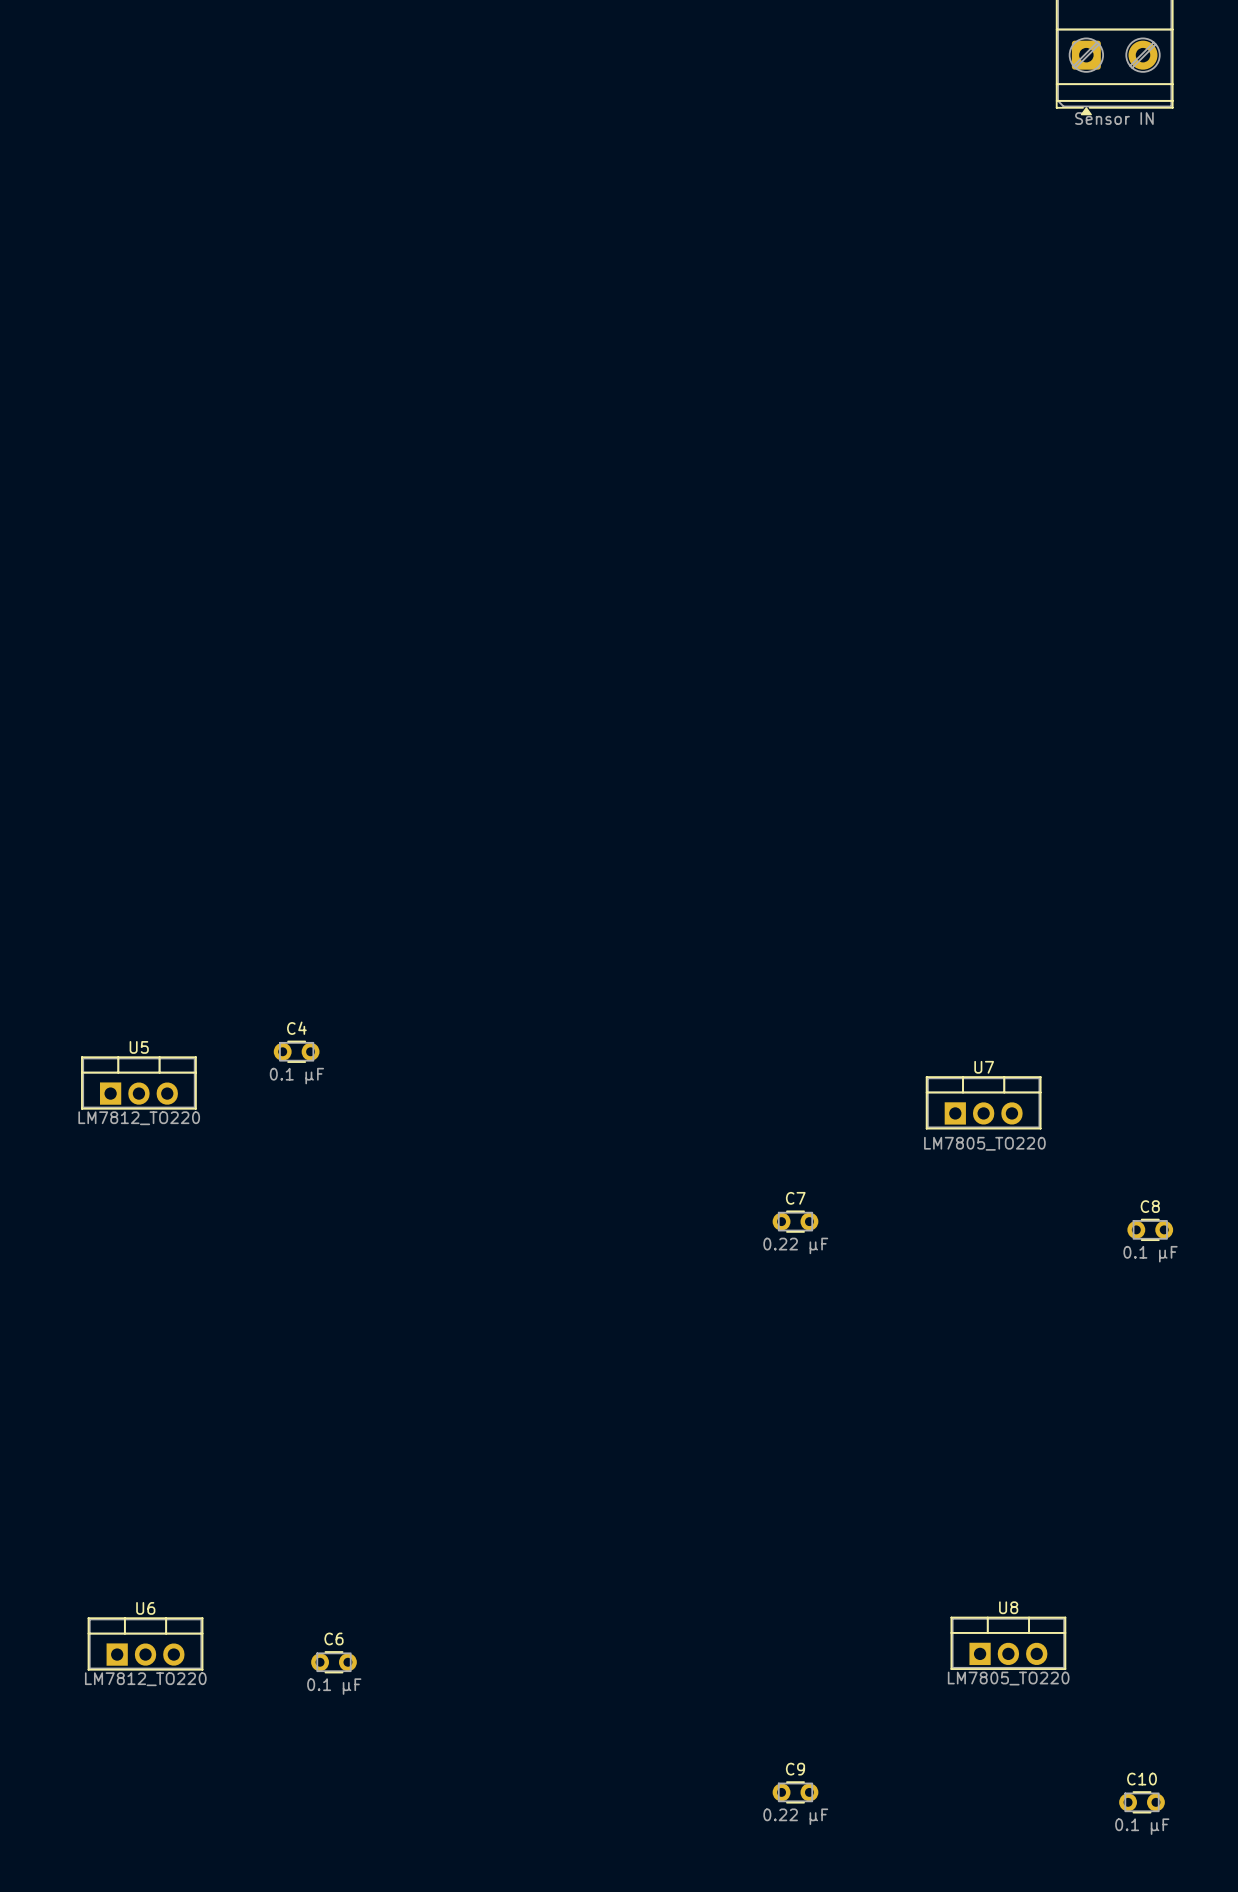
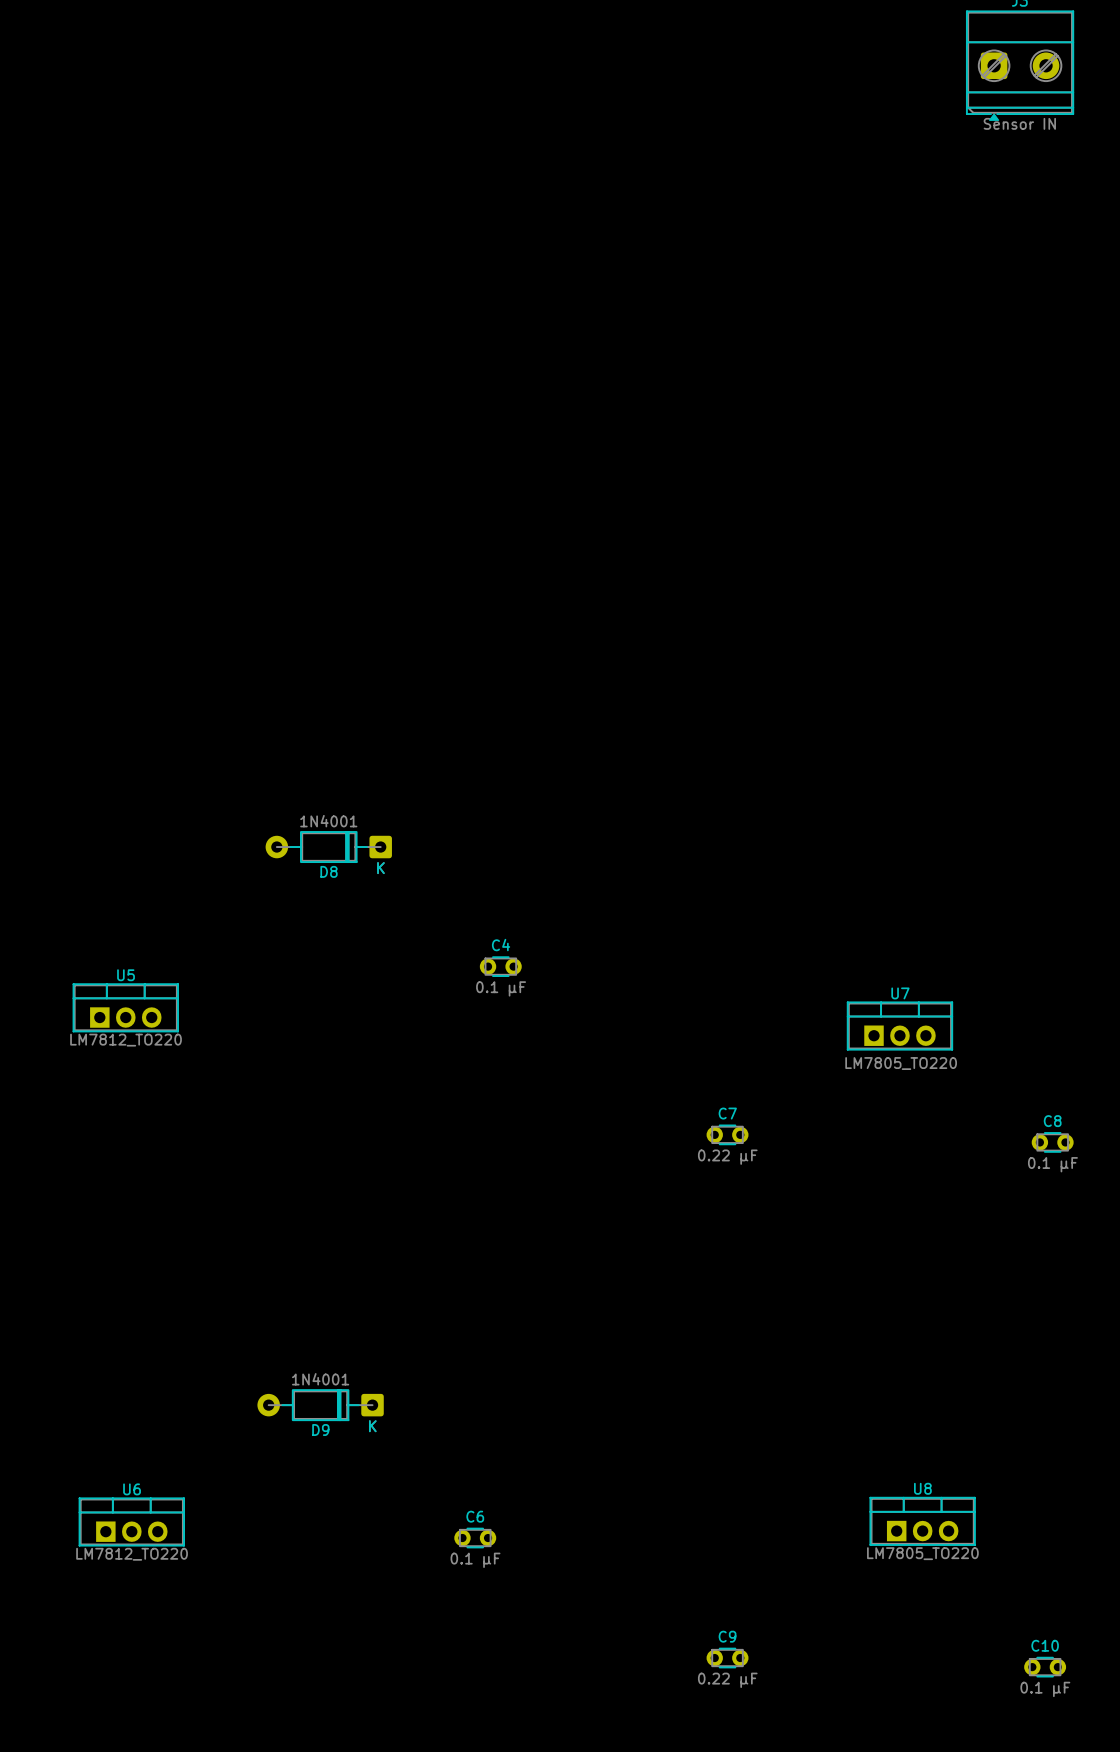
D8: none -> 1N4001 (328, 847)
C4 position: (296, 1051) -> (500, 966)
D9: none -> 1N4001 (320, 1405)
C6 position: (334, 1662) -> (475, 1538)

